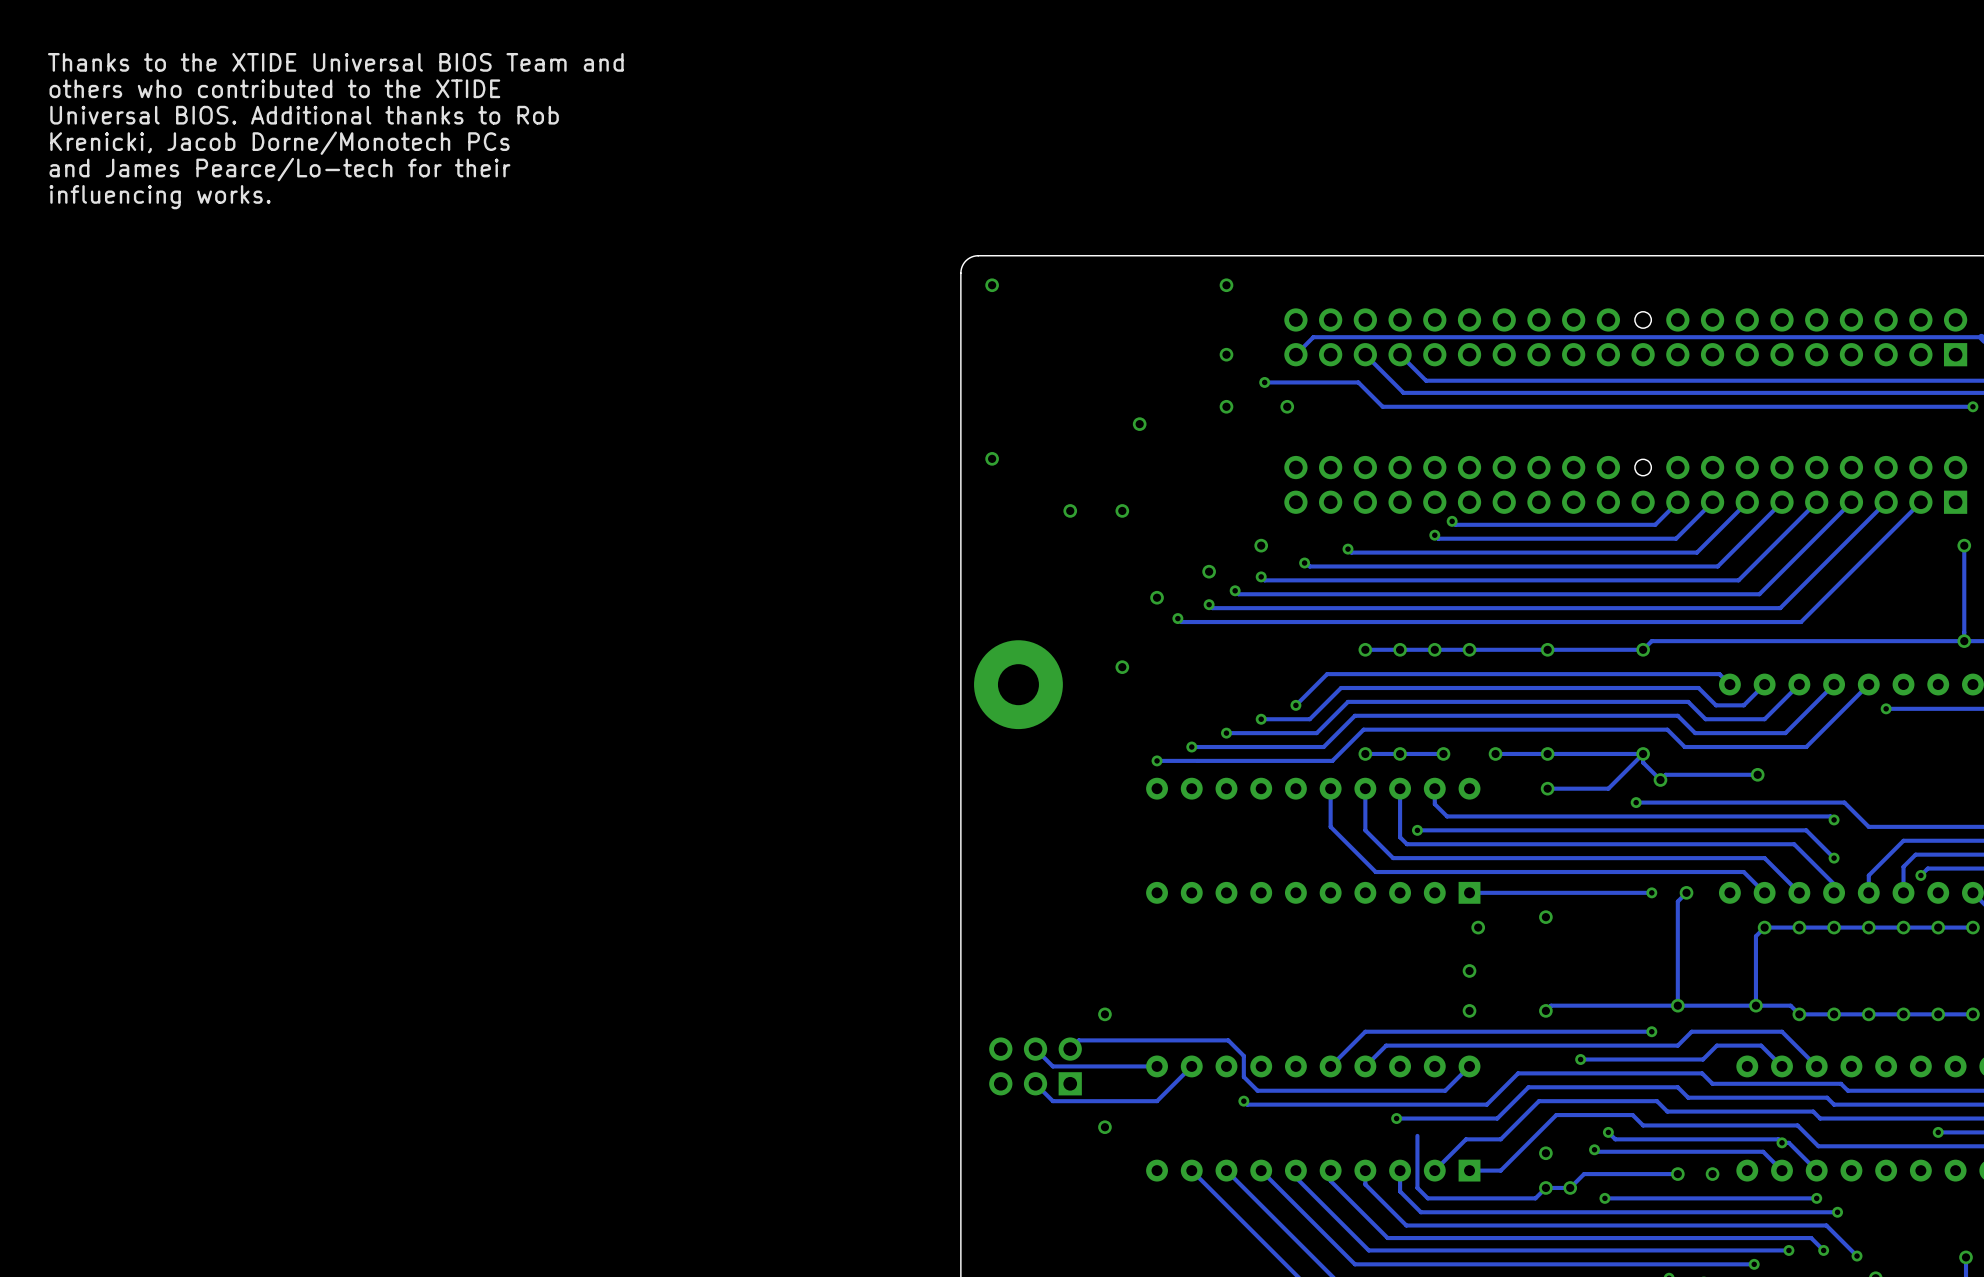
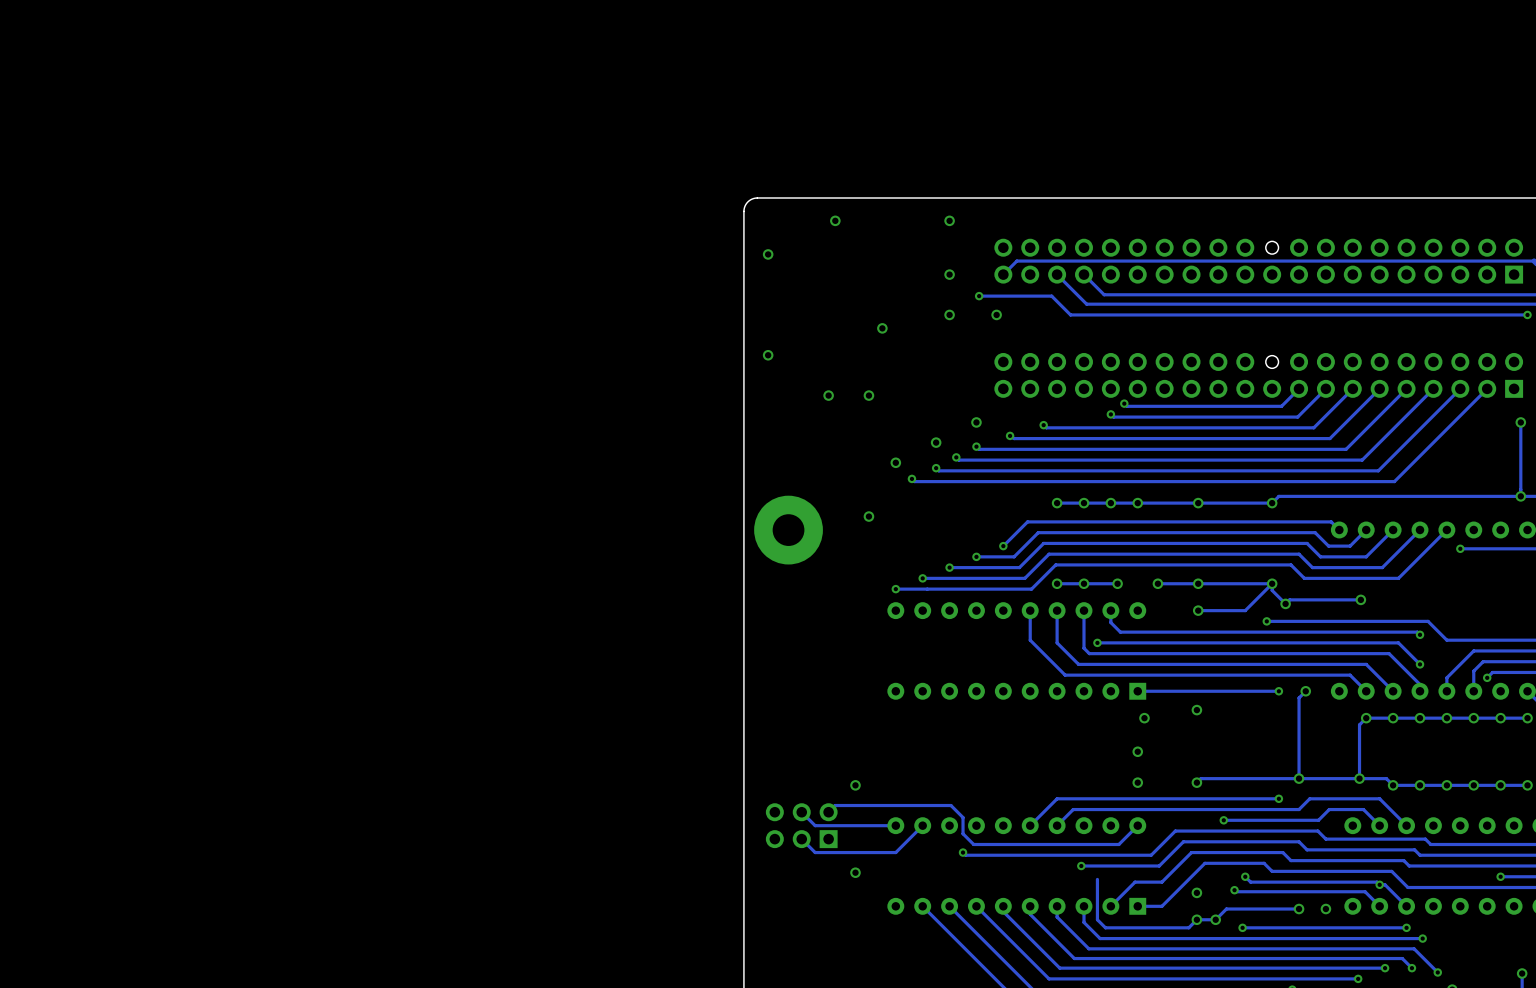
text: Thanks to the XTIDE Universal BIOS Team and (335, 62) -> none
text: others who contributed to the XTIDE (274, 88) -> none
text: Universal BIOS. Additional thanks to Rob (304, 115) -> none
text: Krenicki, Jacob Dorne/Monotech PCs (279, 143) -> none
text: and James Pearce/Lo-tech for their (279, 169) -> none
text: influencing works. (160, 197) -> none
via: (992, 285) -> none
via: none -> (835, 220)
via: none -> (768, 254)

